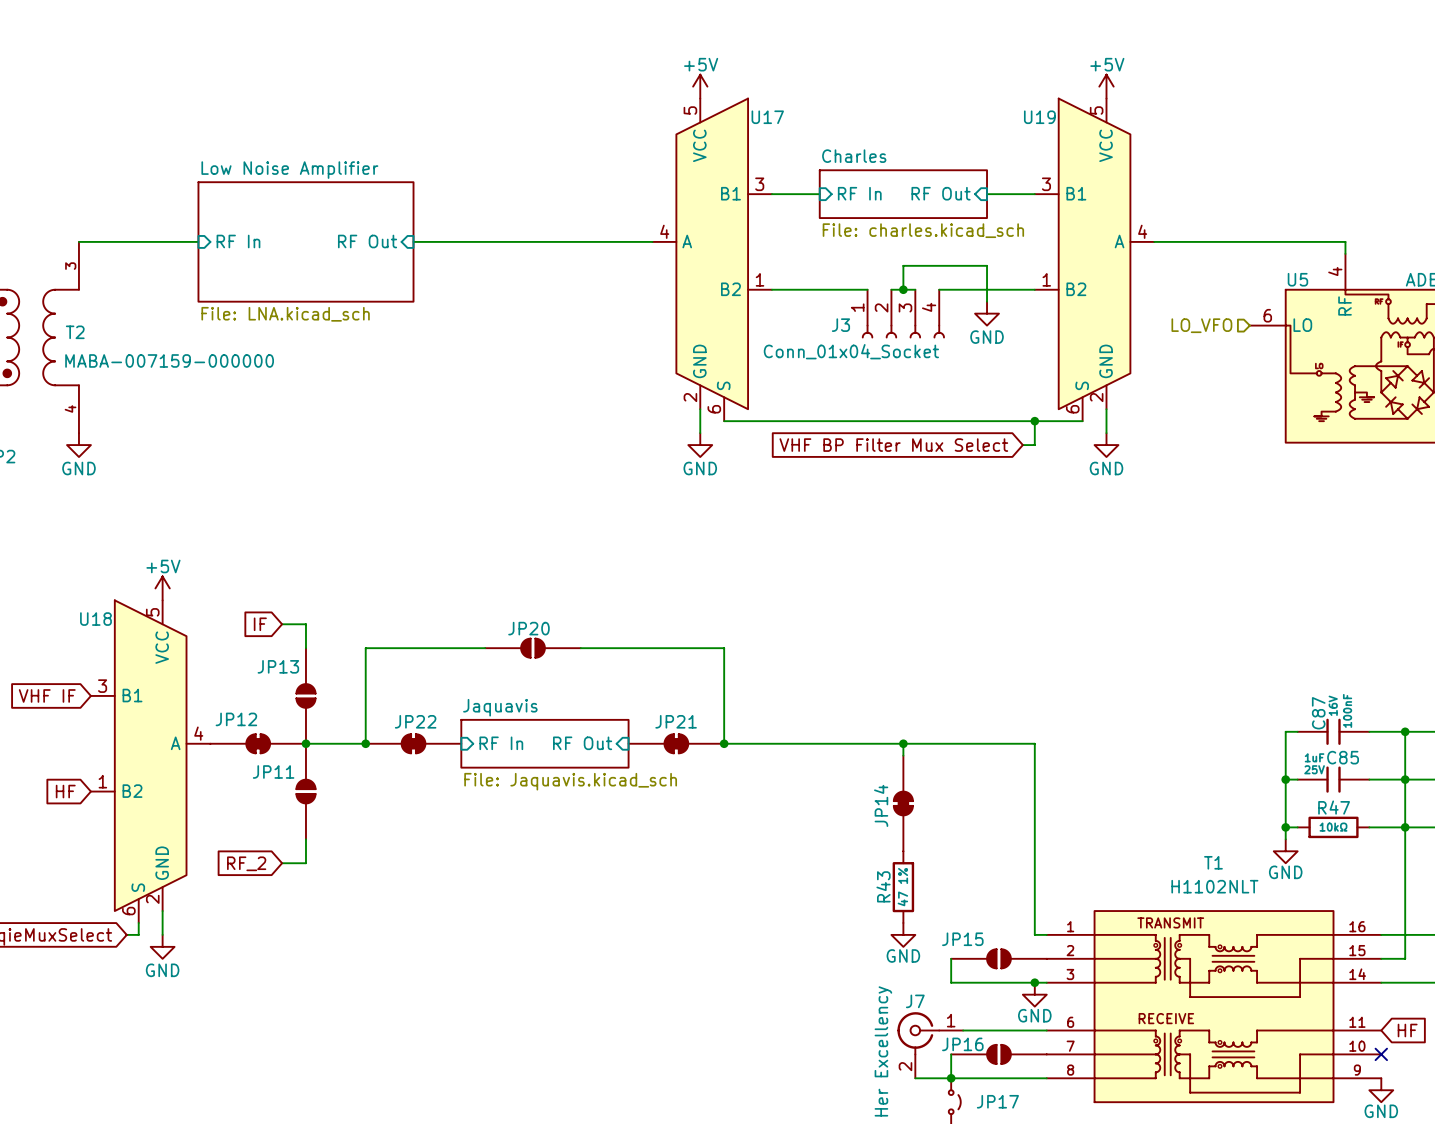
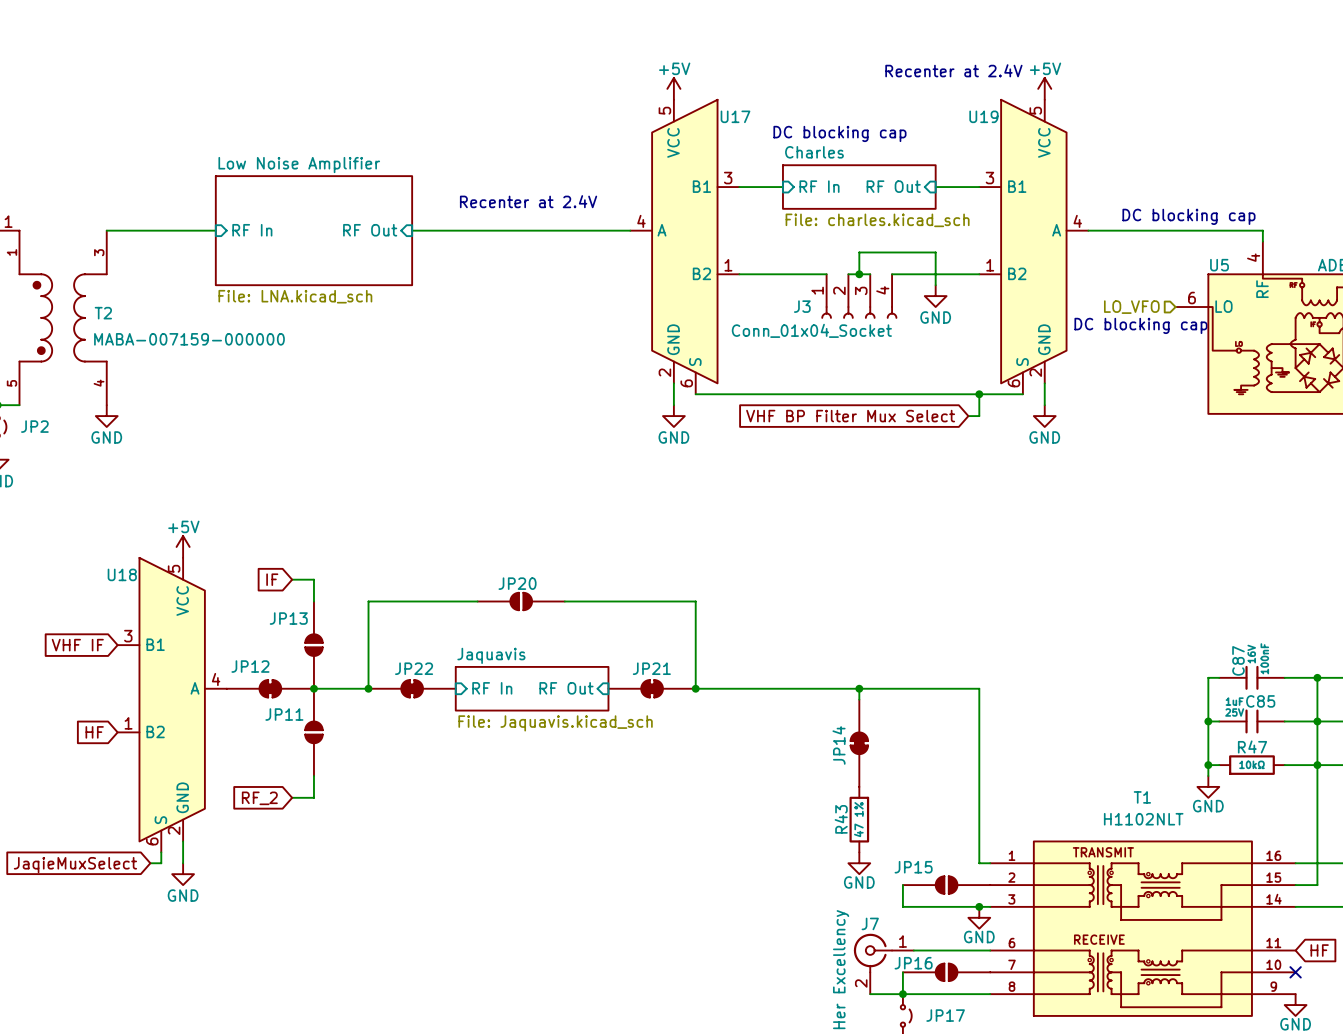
text: none -> Recenter at 2.4V (953, 70)
text: none -> DC blocking cap (839, 133)
text: none -> Recenter at 2.4V (528, 201)
text: none -> DC blocking cap (1188, 216)
text: none -> DC blocking cap (1140, 325)

